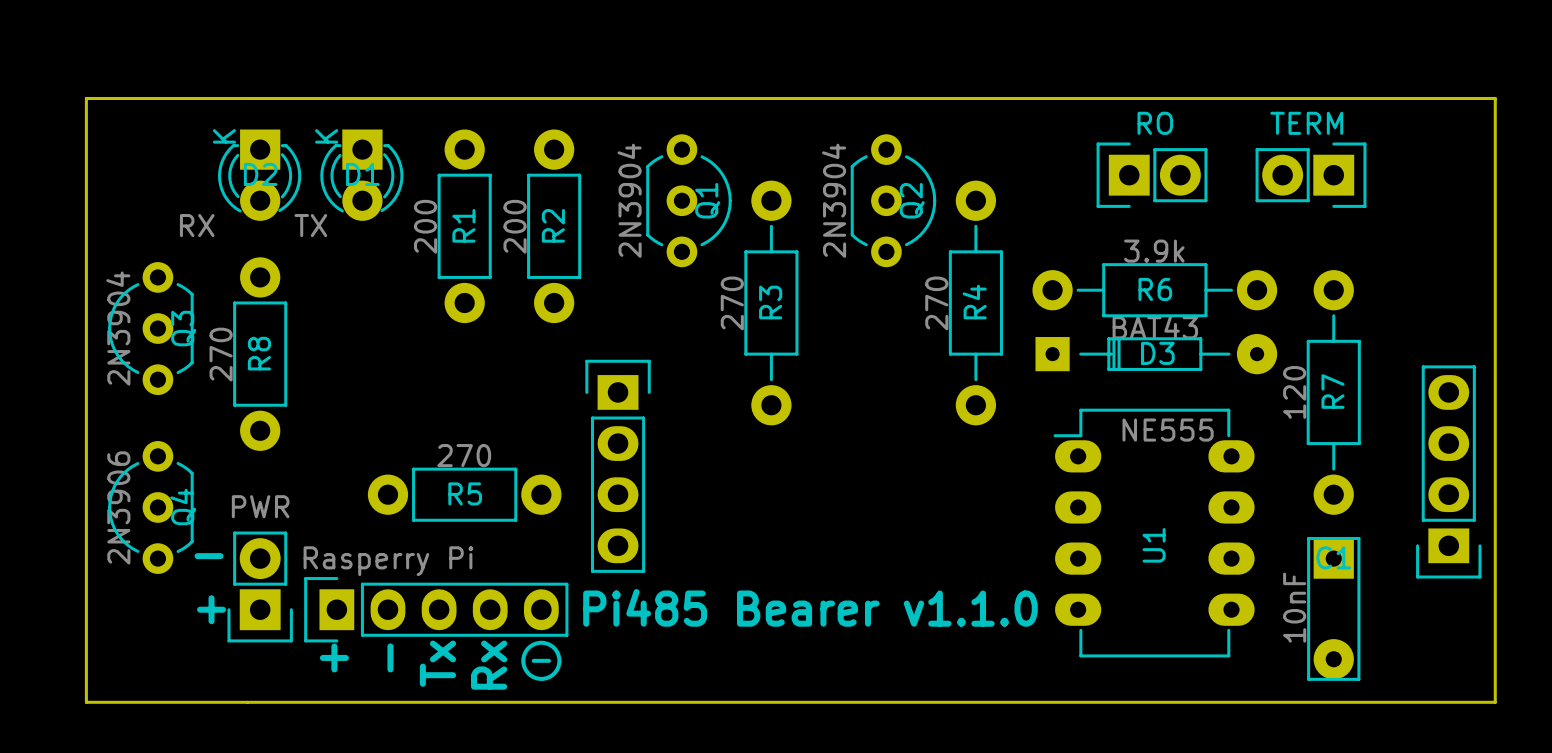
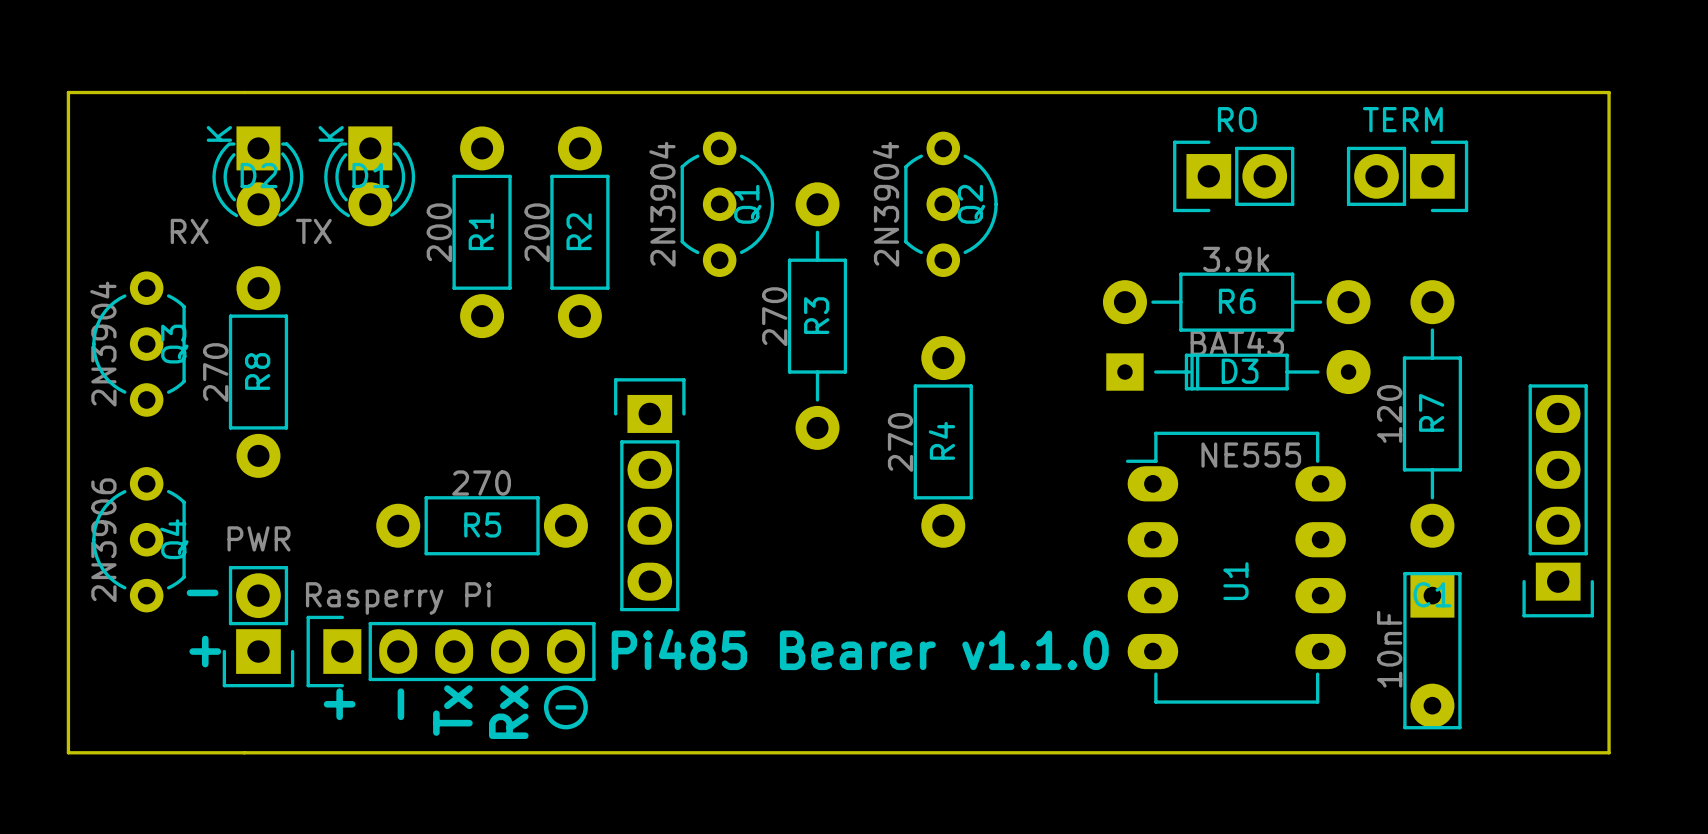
R4 footprint: [948, 180, 1003, 426] -> [913, 336, 973, 548]

